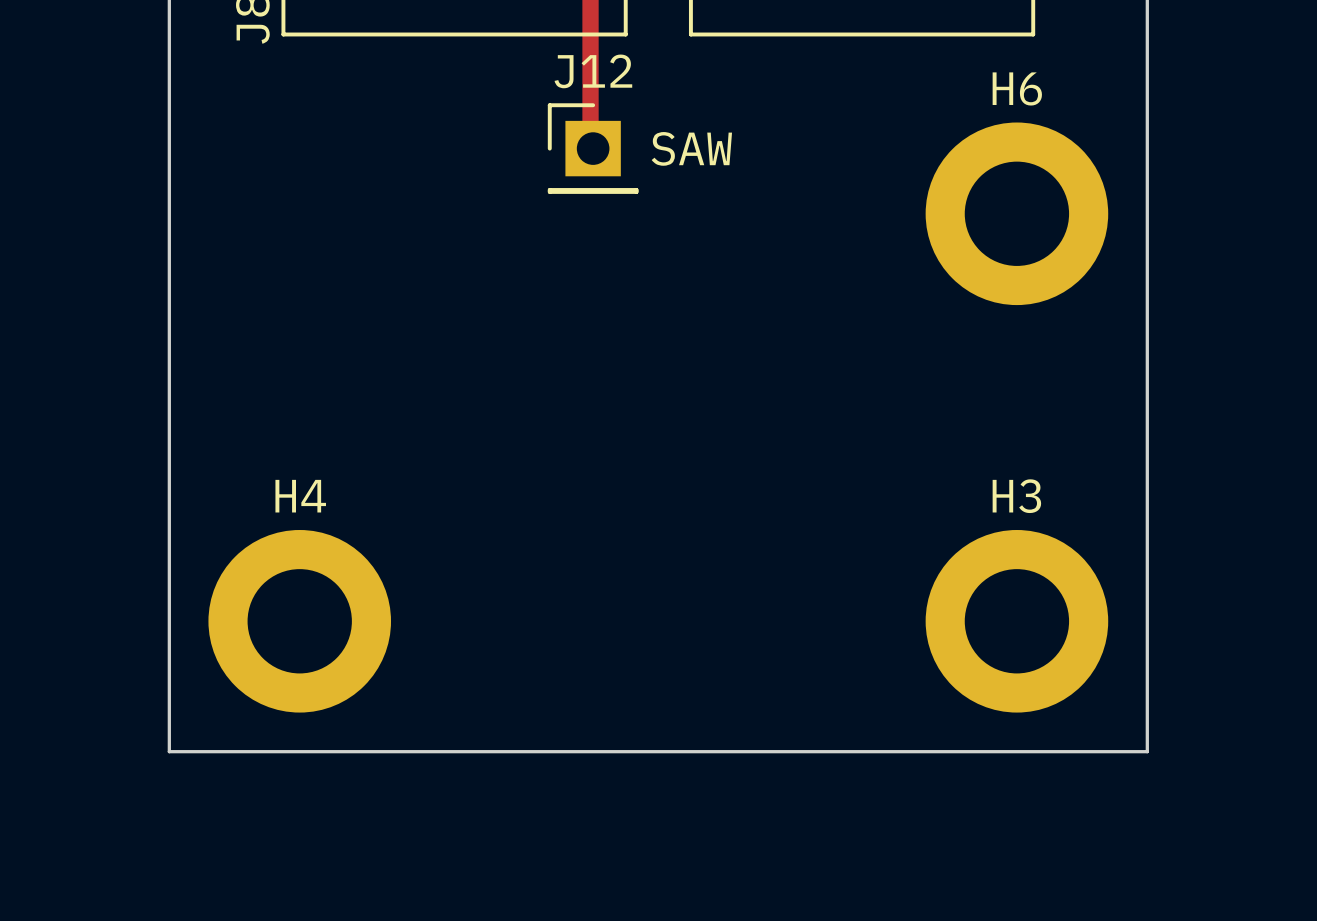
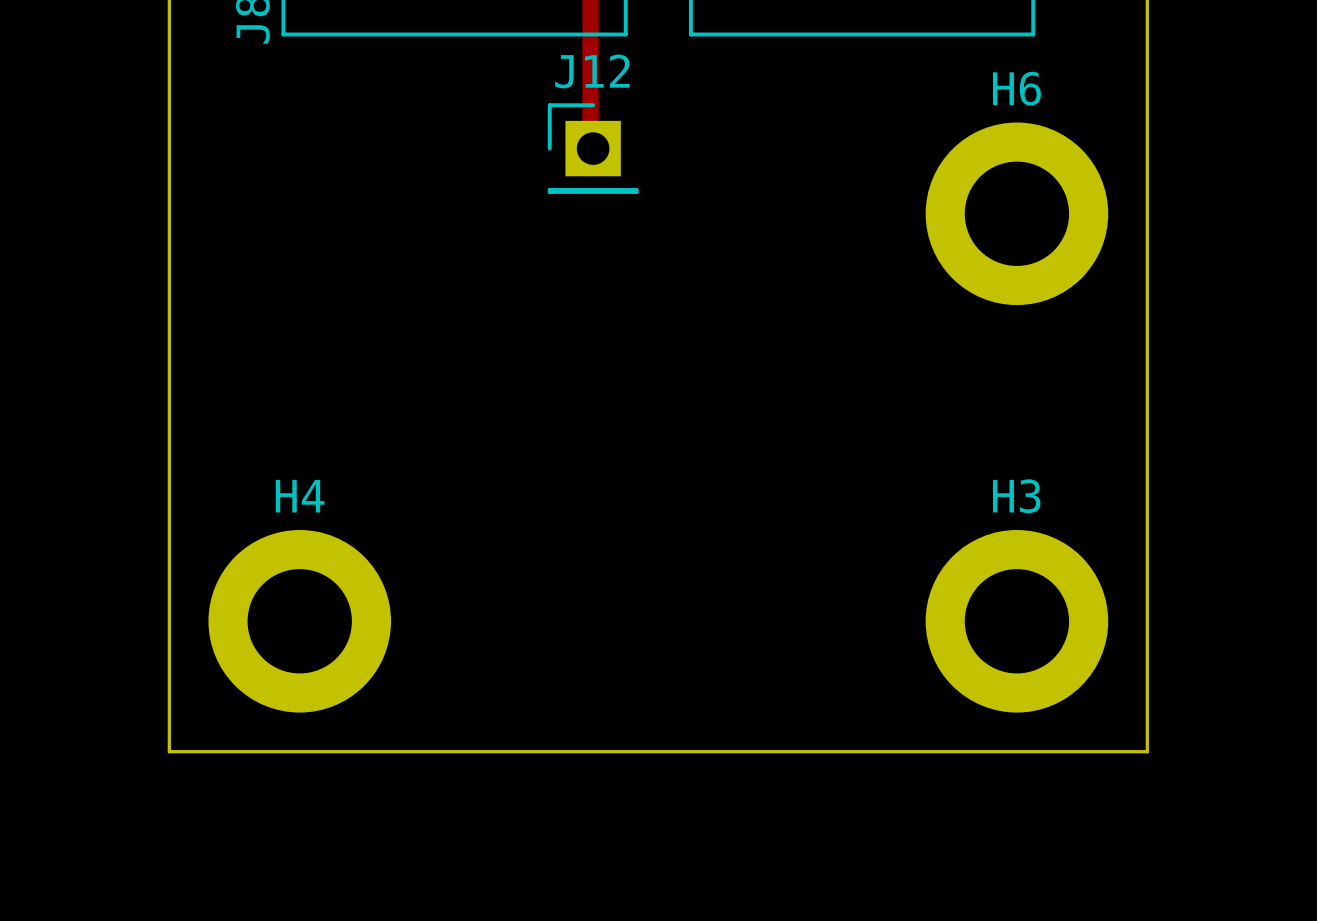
text: SAW (691, 148) -> none

